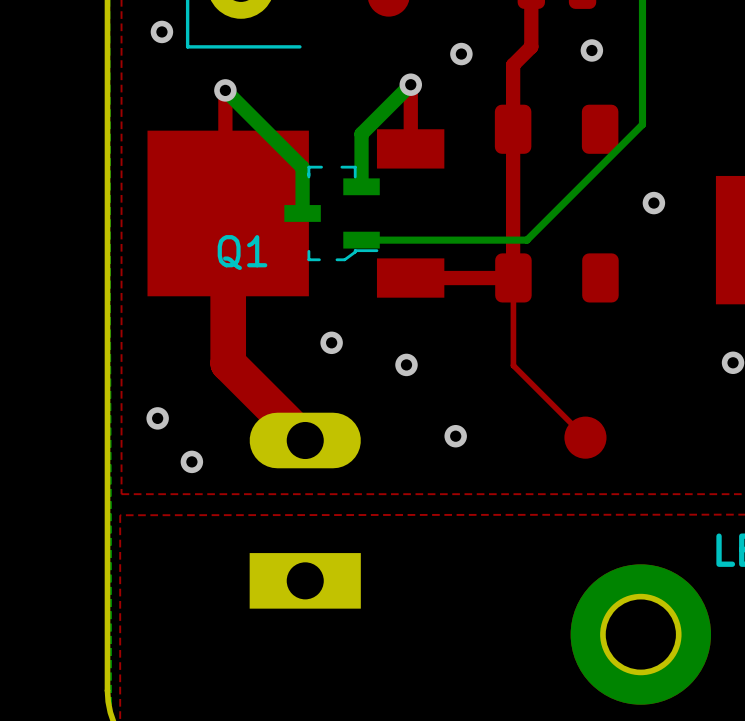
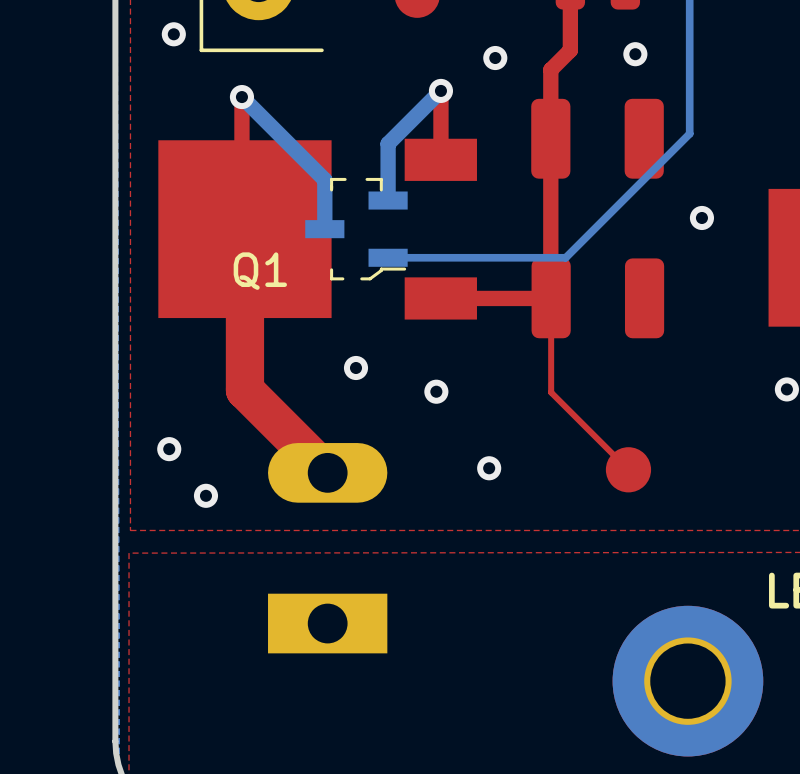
part footprint: [494, 104, 619, 154] -> [531, 98, 664, 179]
part footprint: [495, 253, 619, 303] -> [531, 258, 665, 339]

